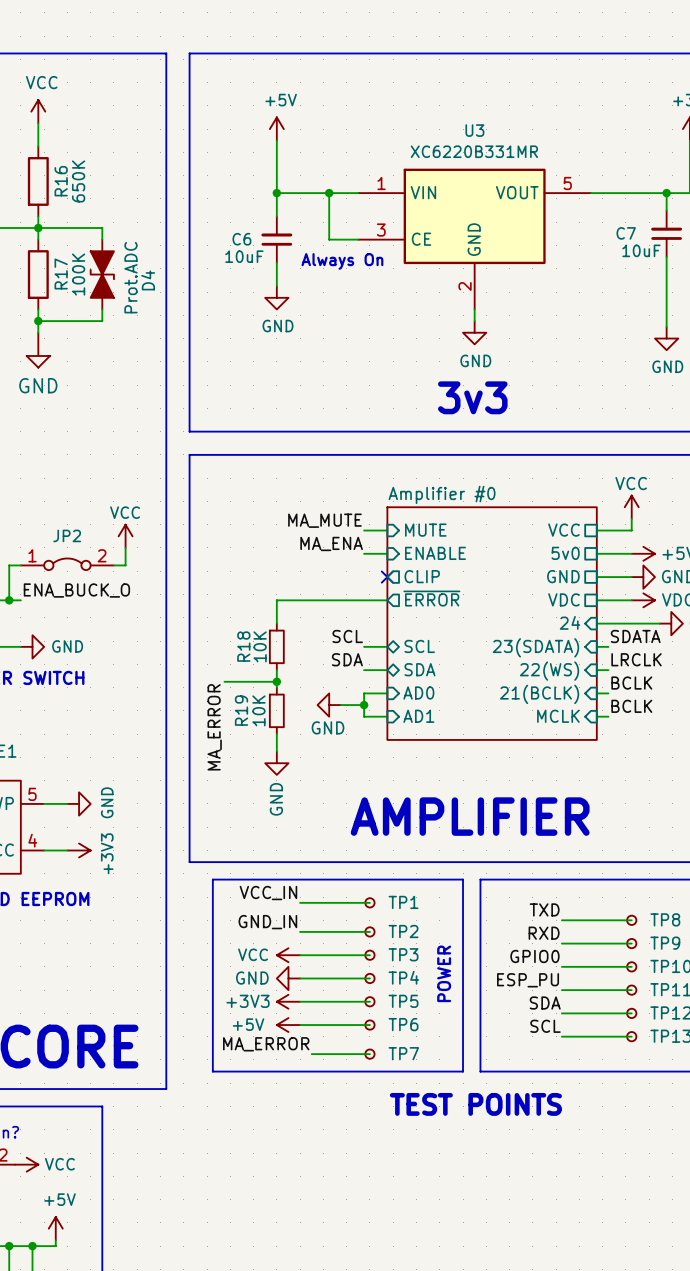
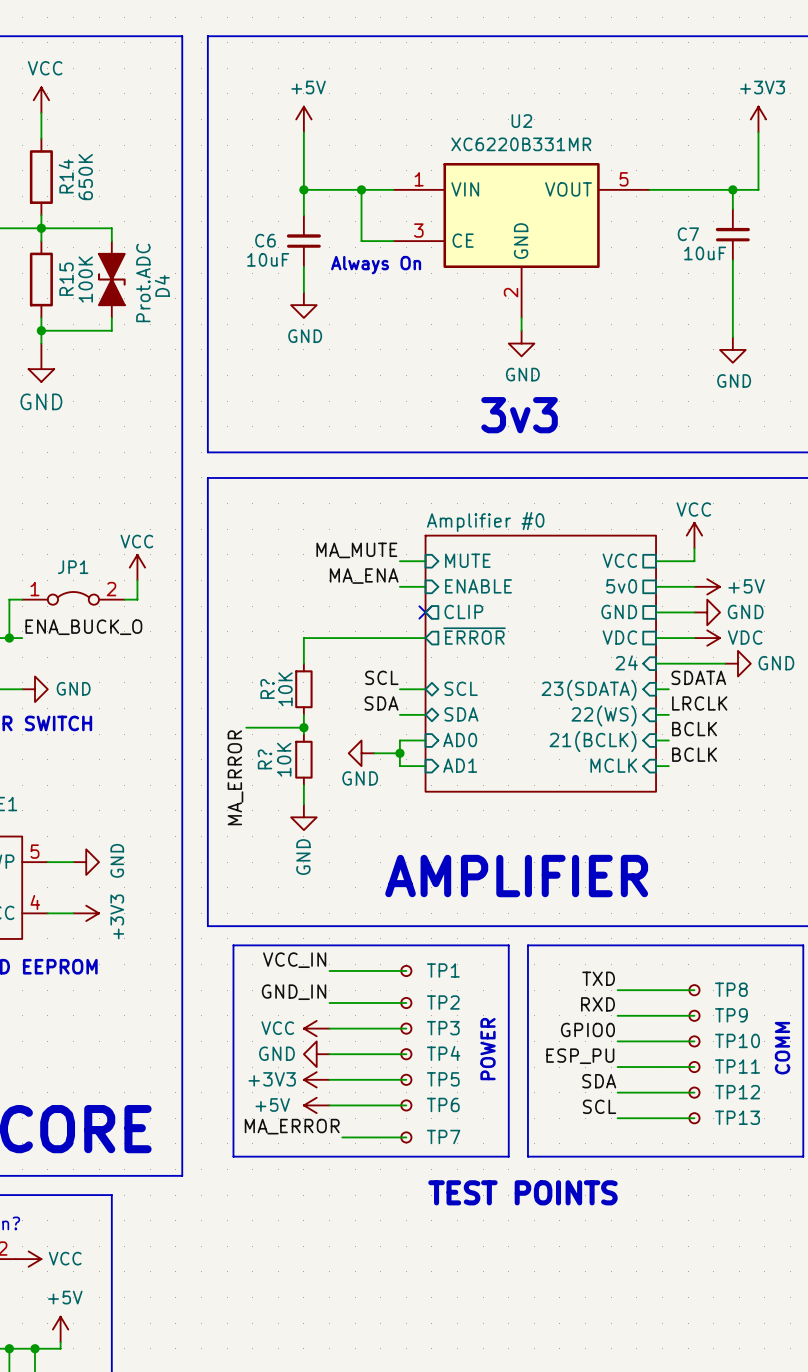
U3 name: U3 (474, 130) -> U2 (521, 121)
R16 name: R16 (61, 181) -> R14 (66, 176)
R17 name: R17 (61, 273) -> R15 (66, 279)
JP2 name: JP2 (67, 535) -> JP1 (73, 567)
R18 name: R18 (243, 646) -> R? (267, 688)
R19 name: R19 (241, 710) -> R? (265, 759)

